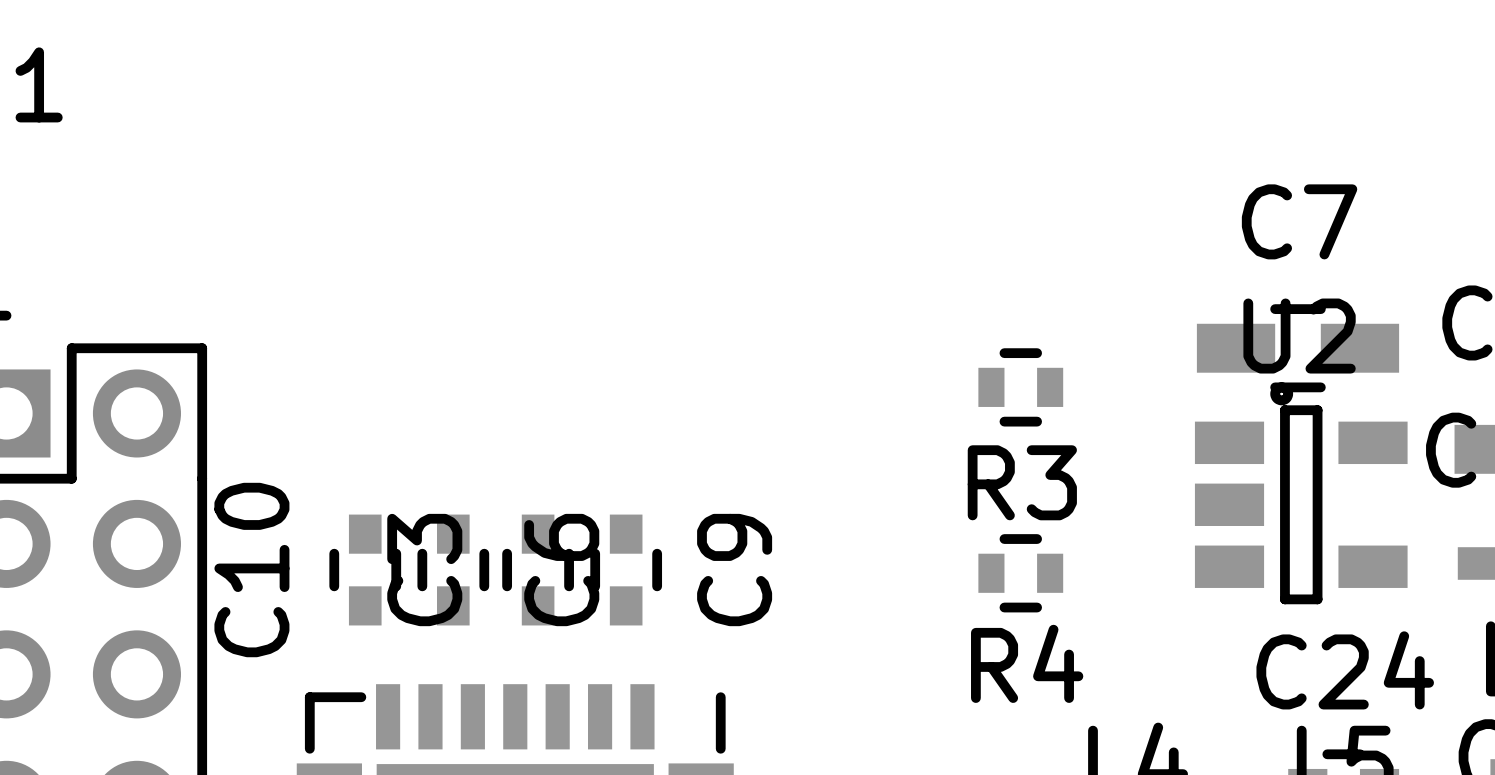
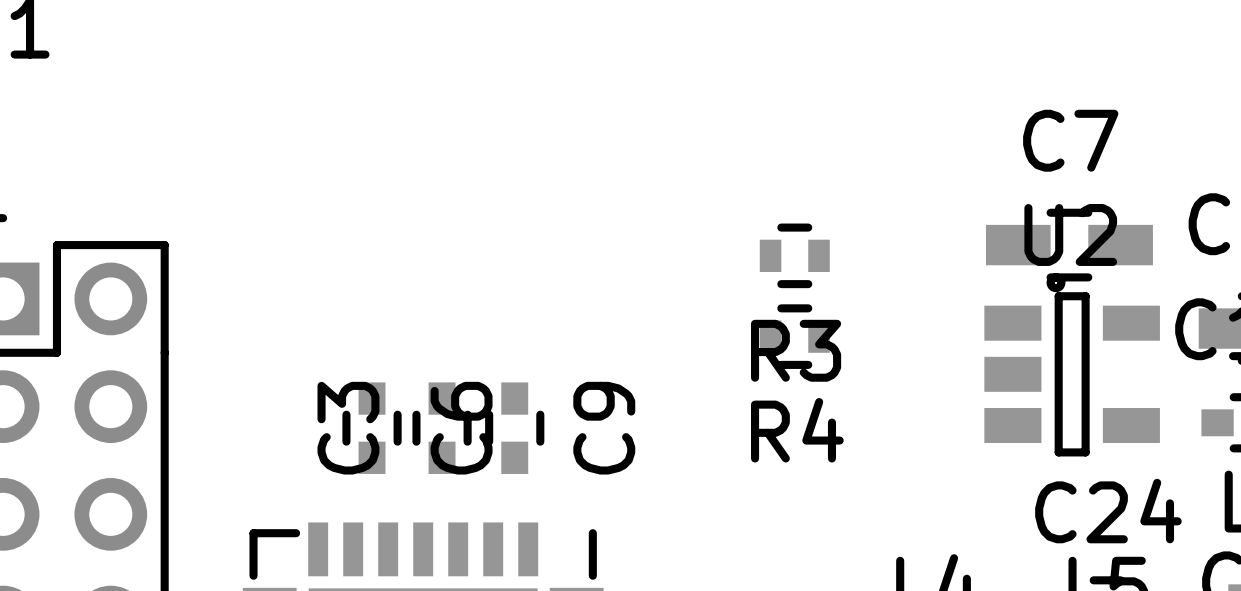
R3 position: (1020, 387) -> (794, 255)
R3 name position: R3 (1022, 482) -> R3 (796, 350)
C10: (365, 570) -> none
R4 position: (1020, 573) -> (794, 336)
R4 name position: R4 (1027, 663) -> R4 (797, 430)

